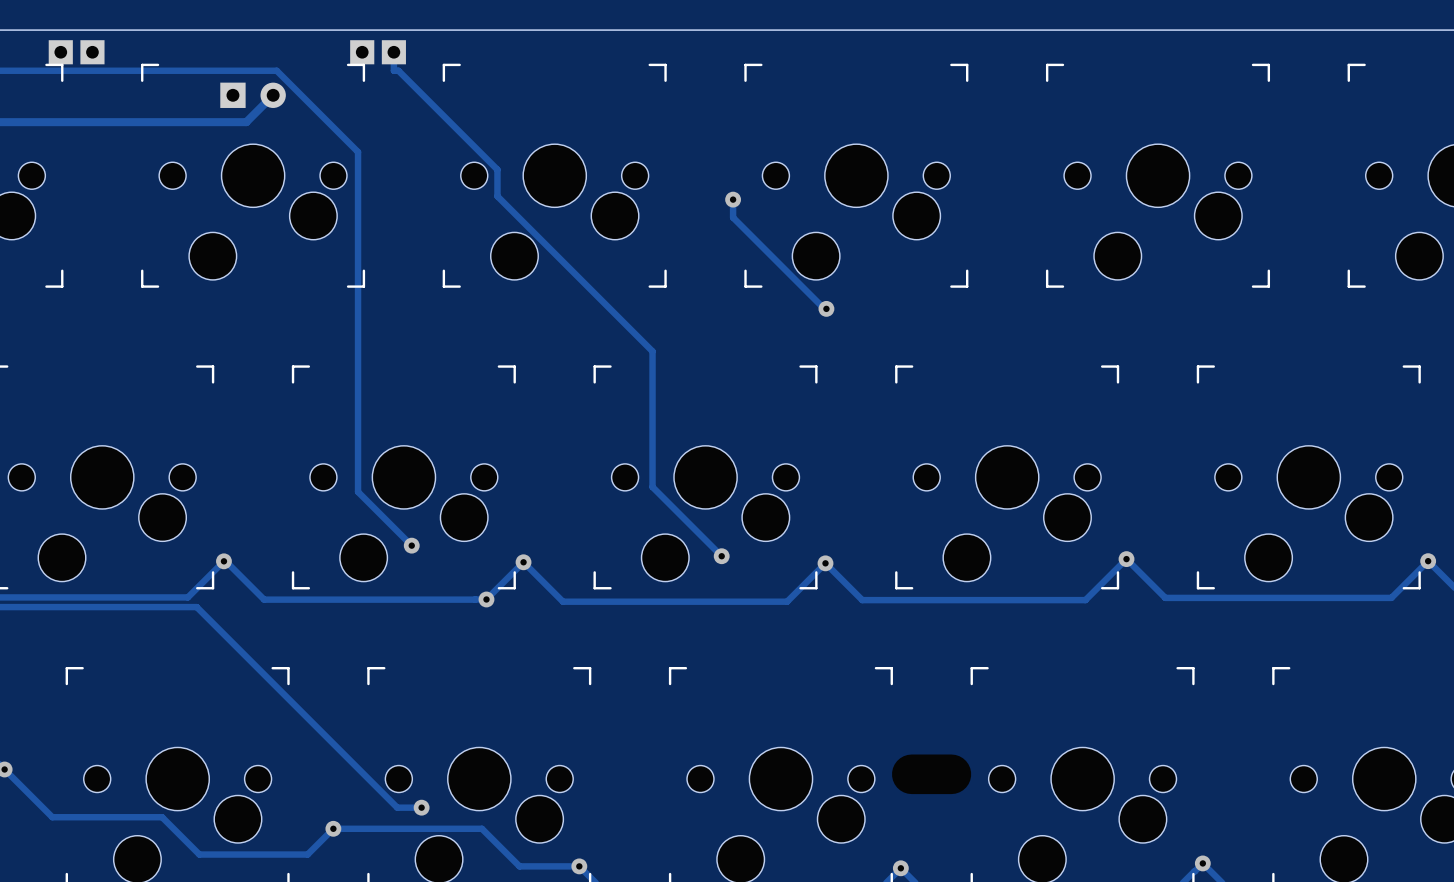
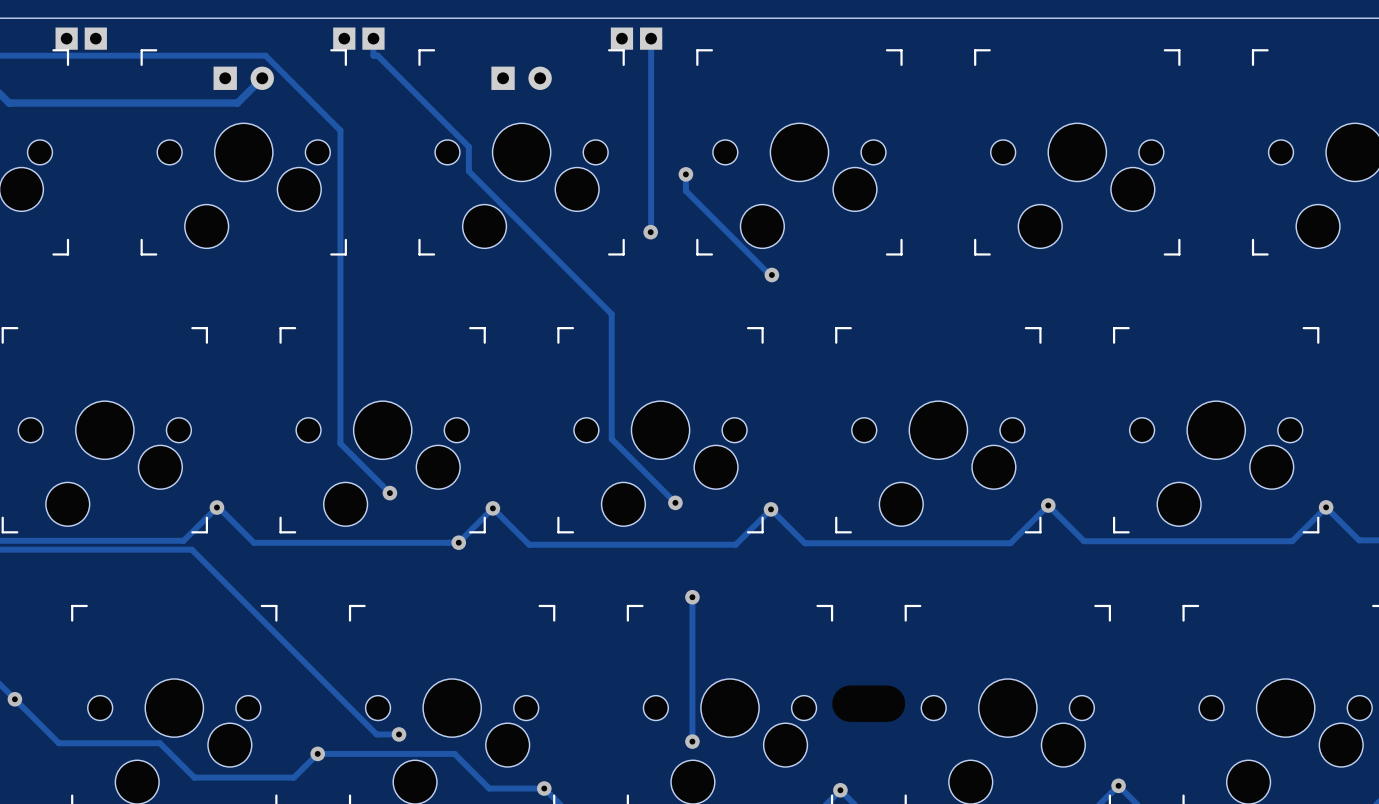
part: none -> (636, 38)
track: none -> (651, 38) (650, 232)
part: none -> (521, 78)
via: none -> (650, 232)
track: none -> (692, 597) (692, 741)
via: none -> (692, 597)
via: none -> (692, 741)

